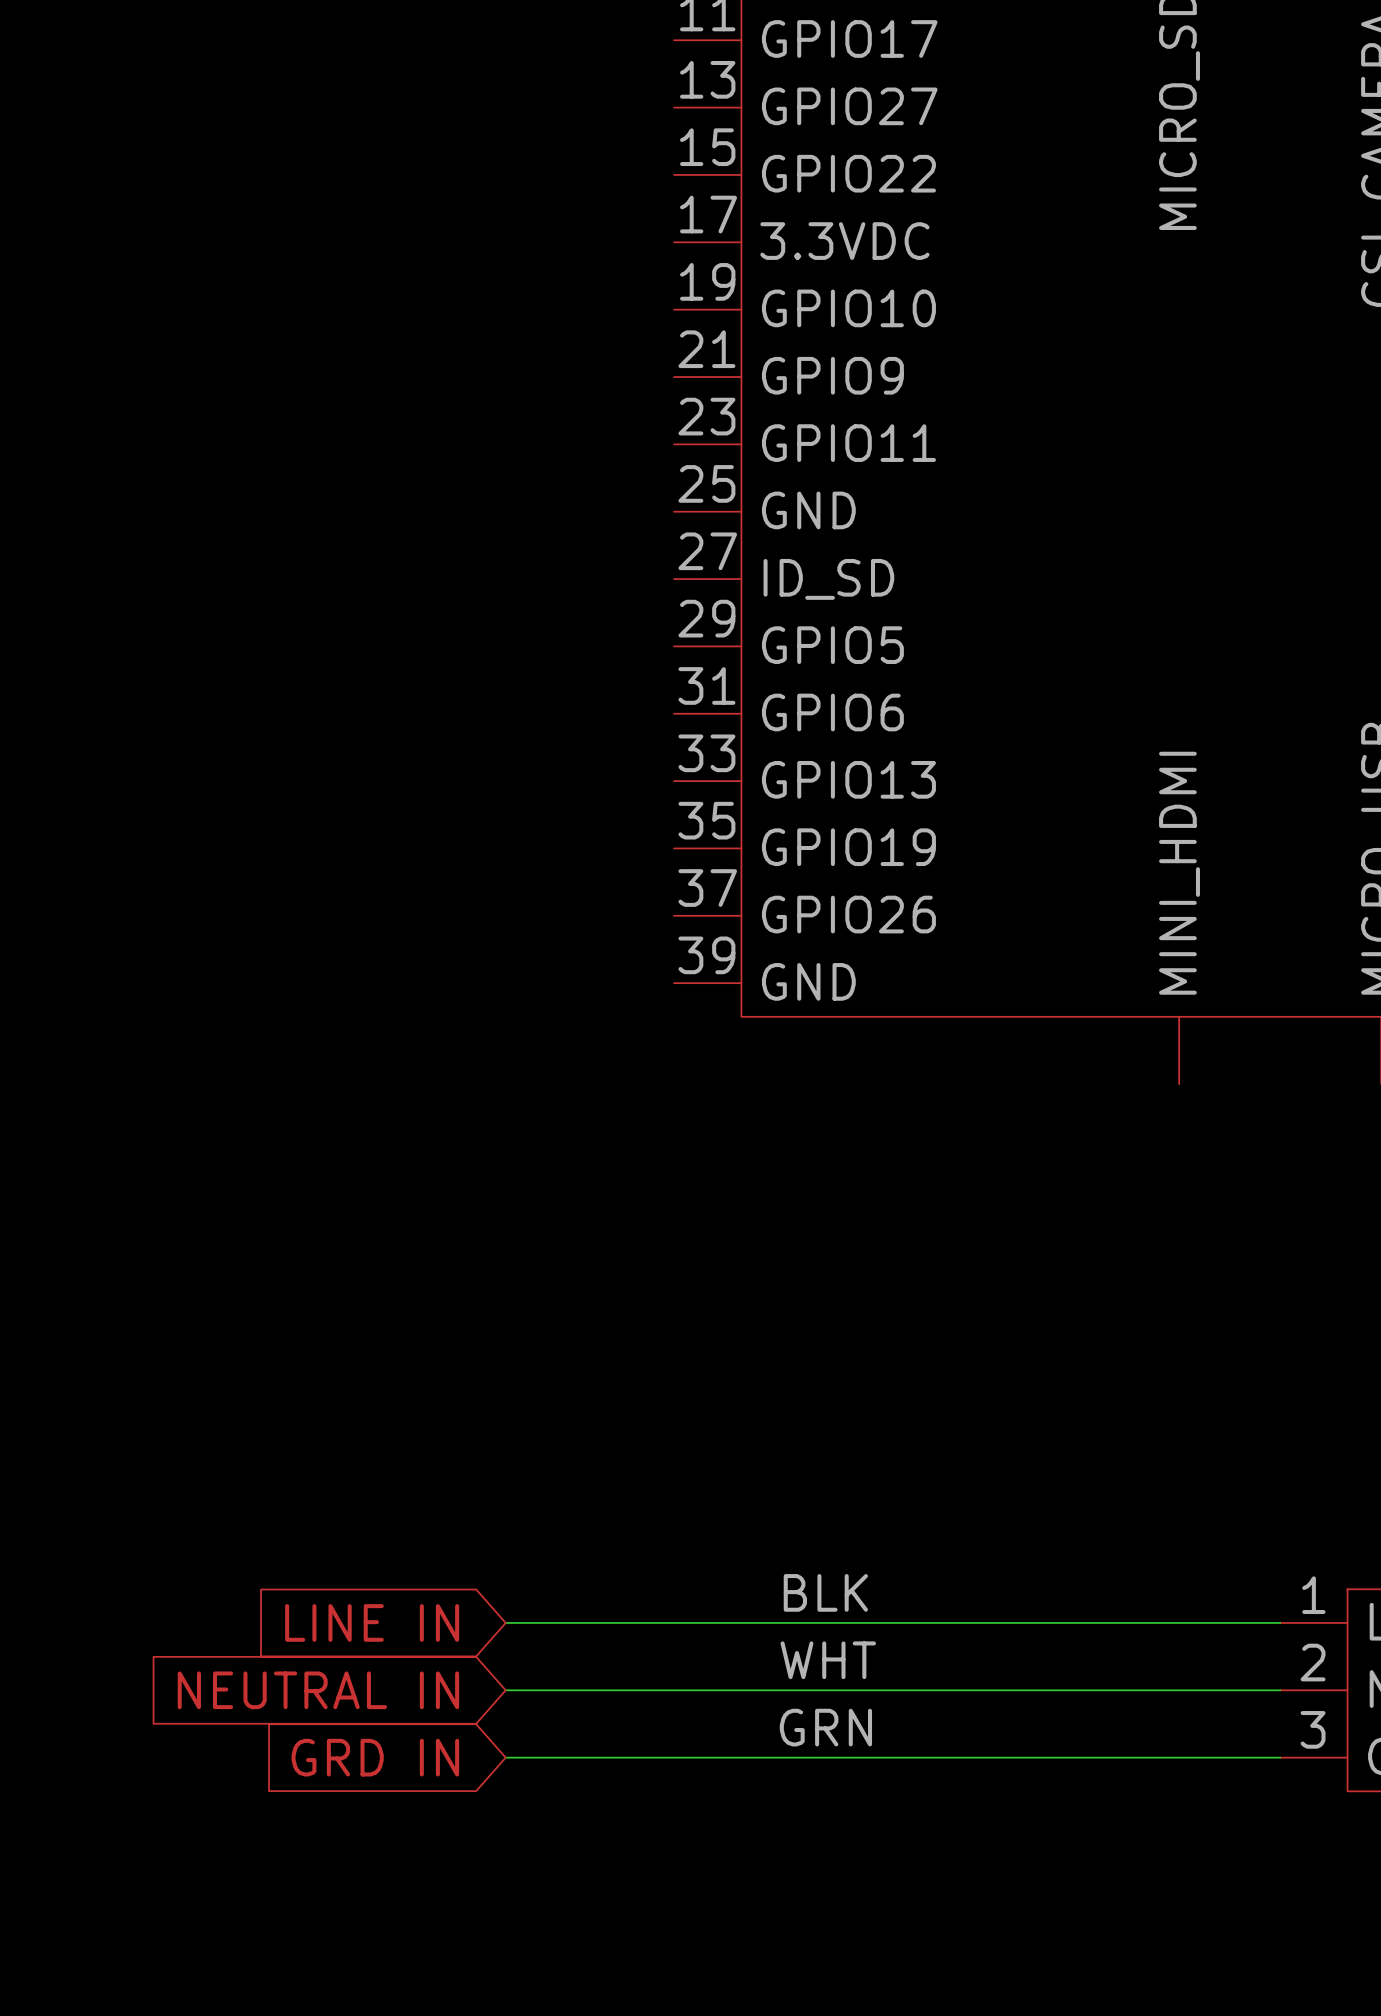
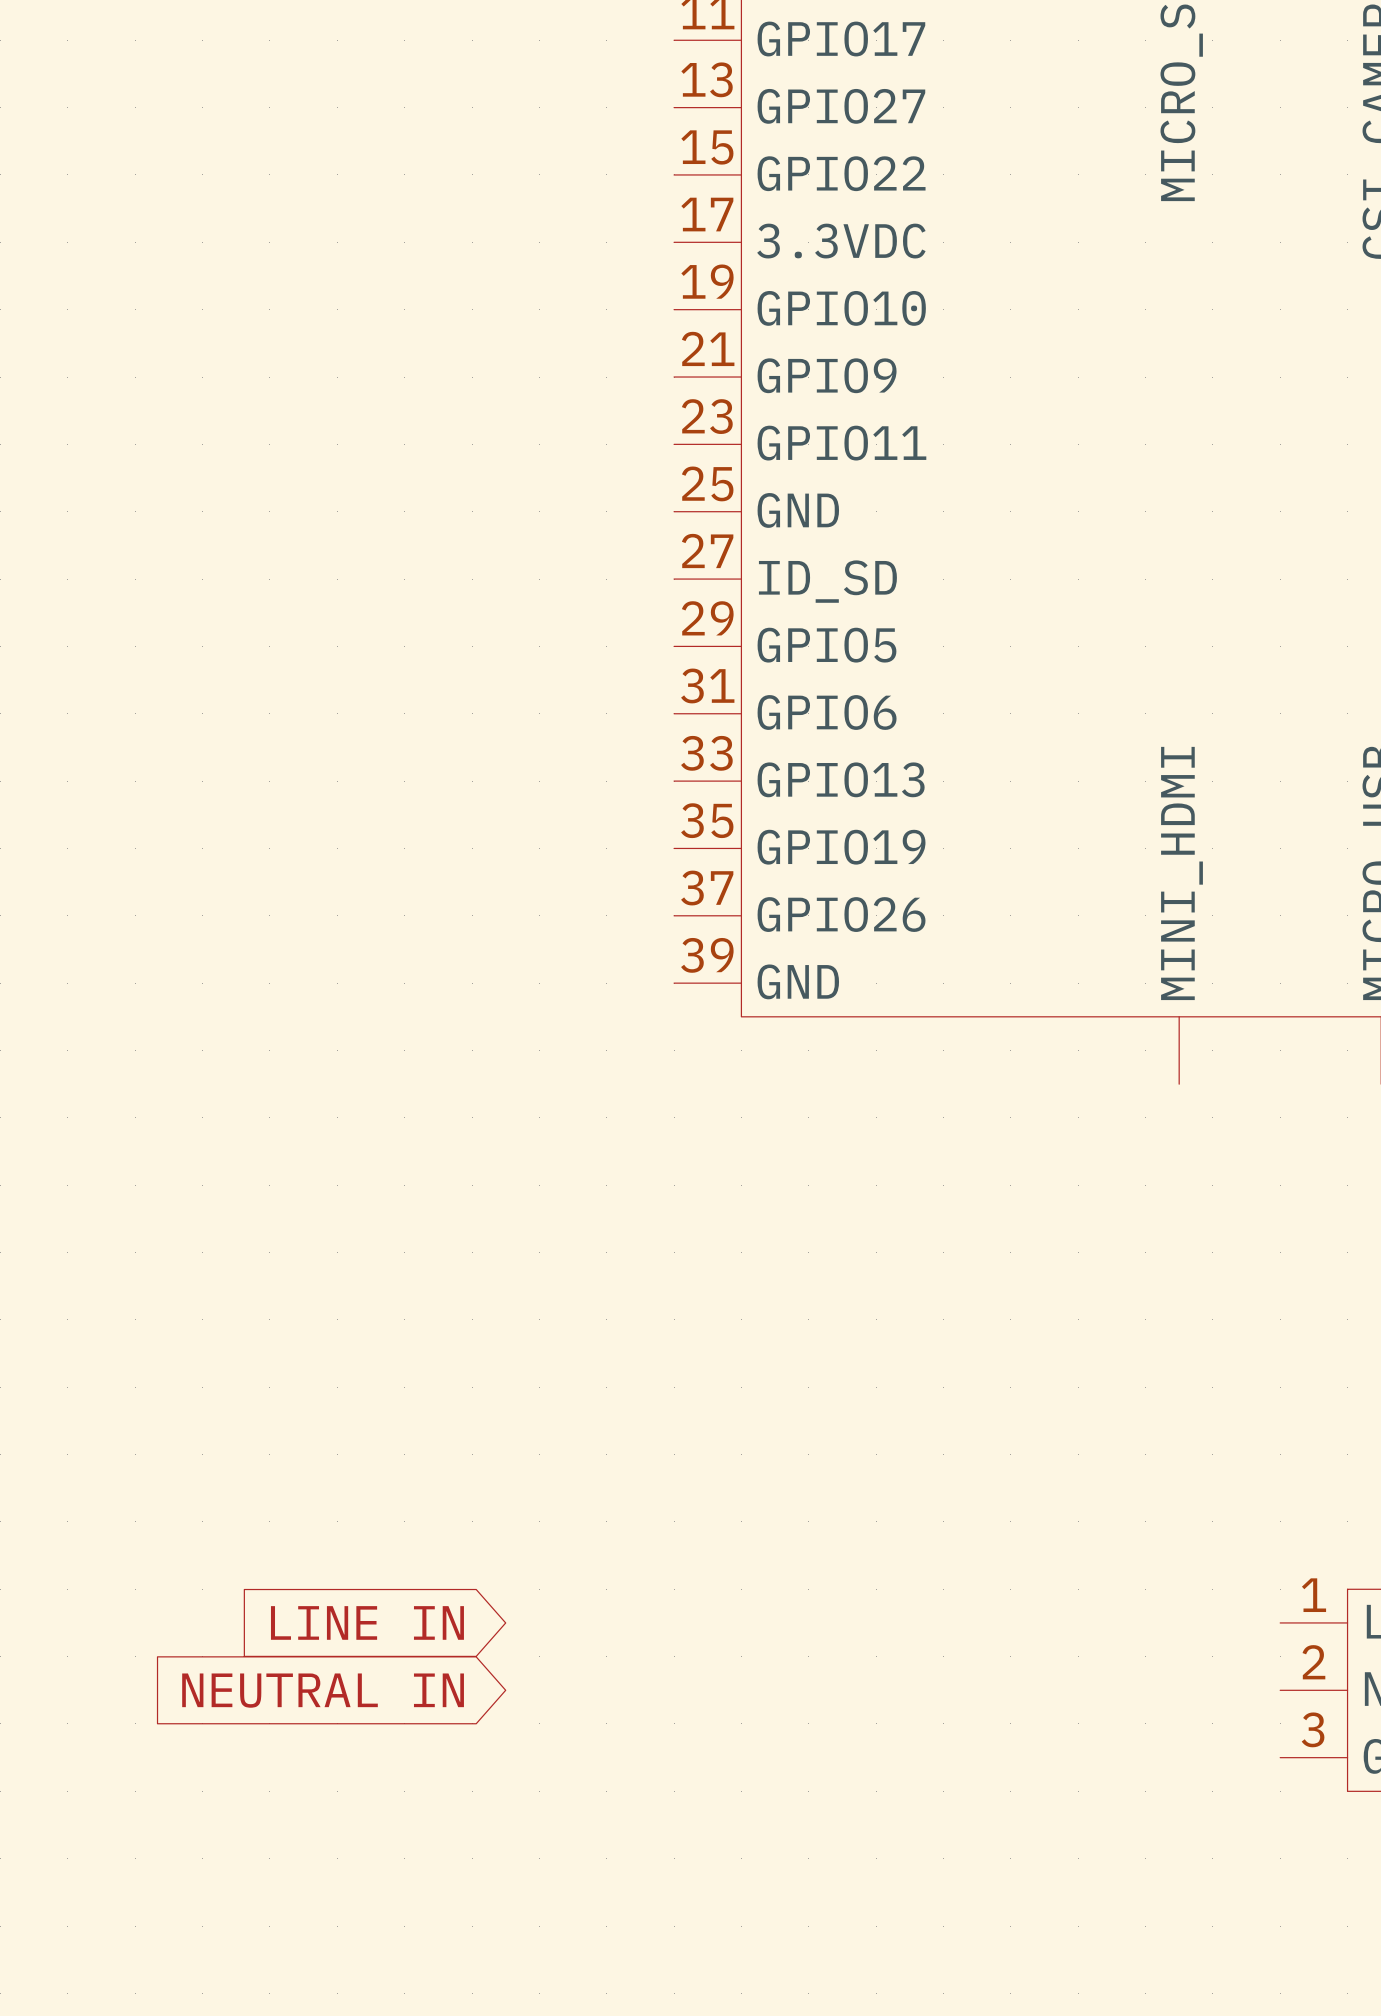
label: BLK (825, 1592) -> none
wire: (505, 1622) (1280, 1622) -> none
label: WHT (828, 1660) -> none
wire: (505, 1690) (1280, 1690) -> none
label: GRN (825, 1727) -> none
global label: GRD IN (375, 1757) -> none
wire: (505, 1757) (1280, 1757) -> none

